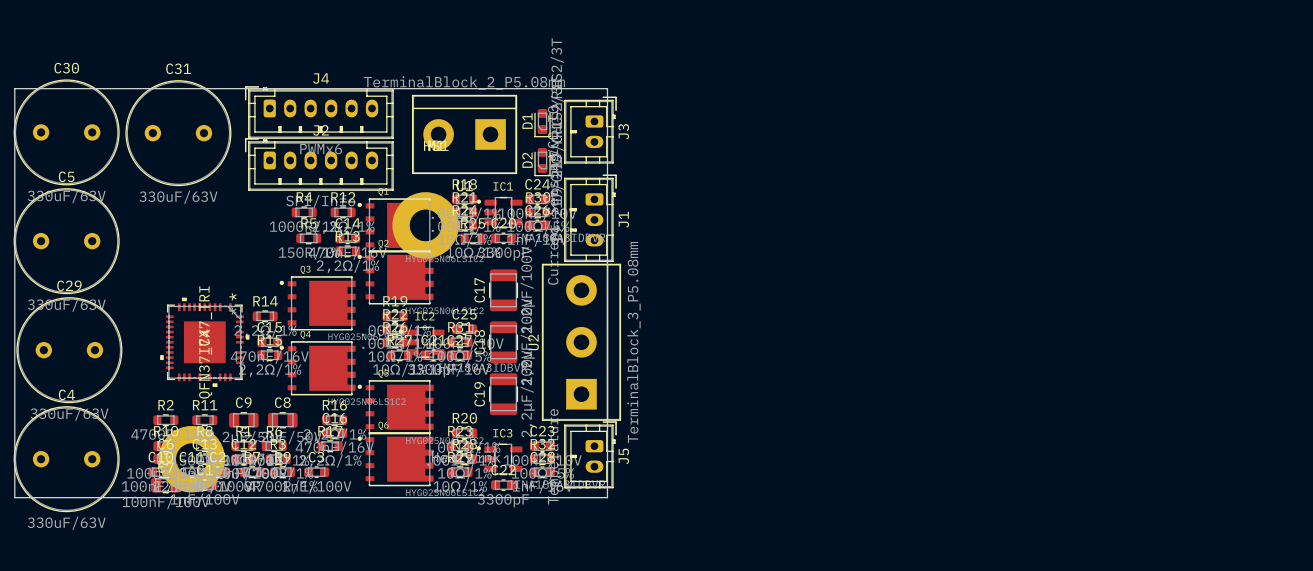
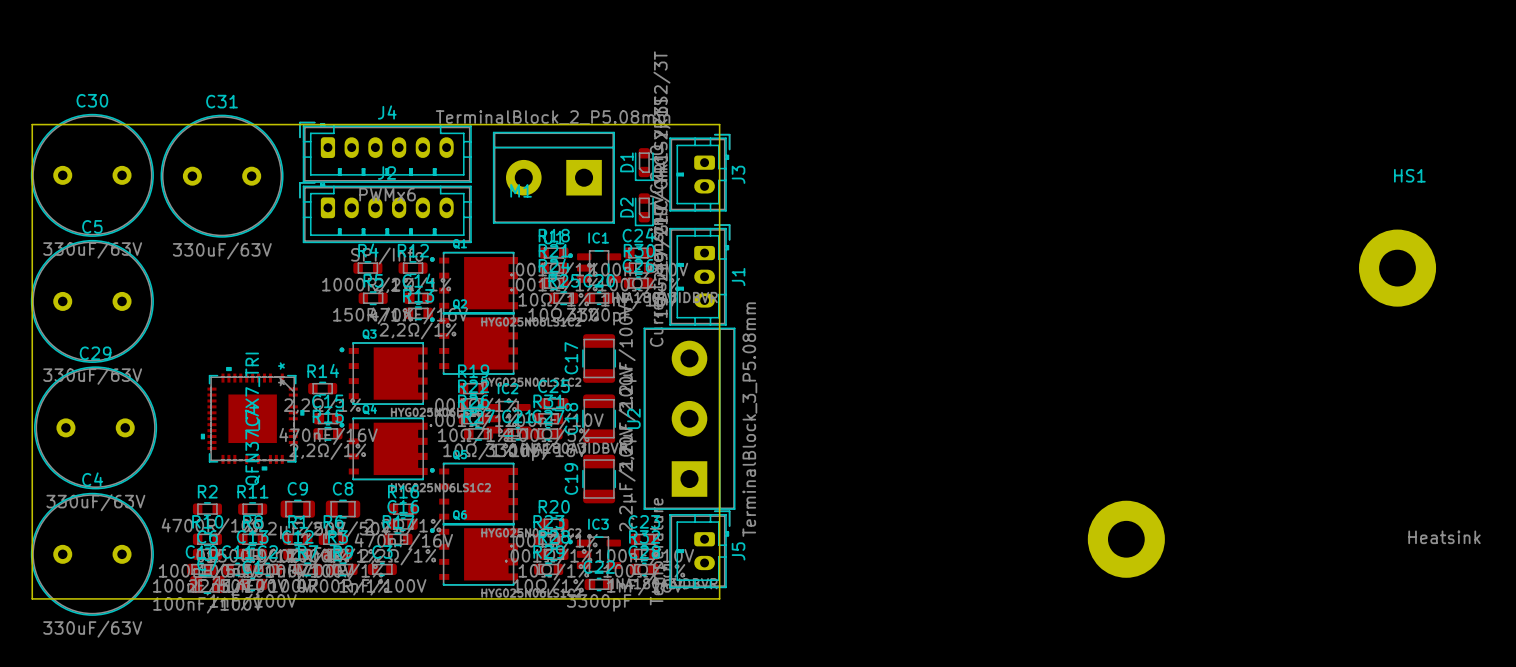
HS1 position: (308, 342) -> (1261, 403)

